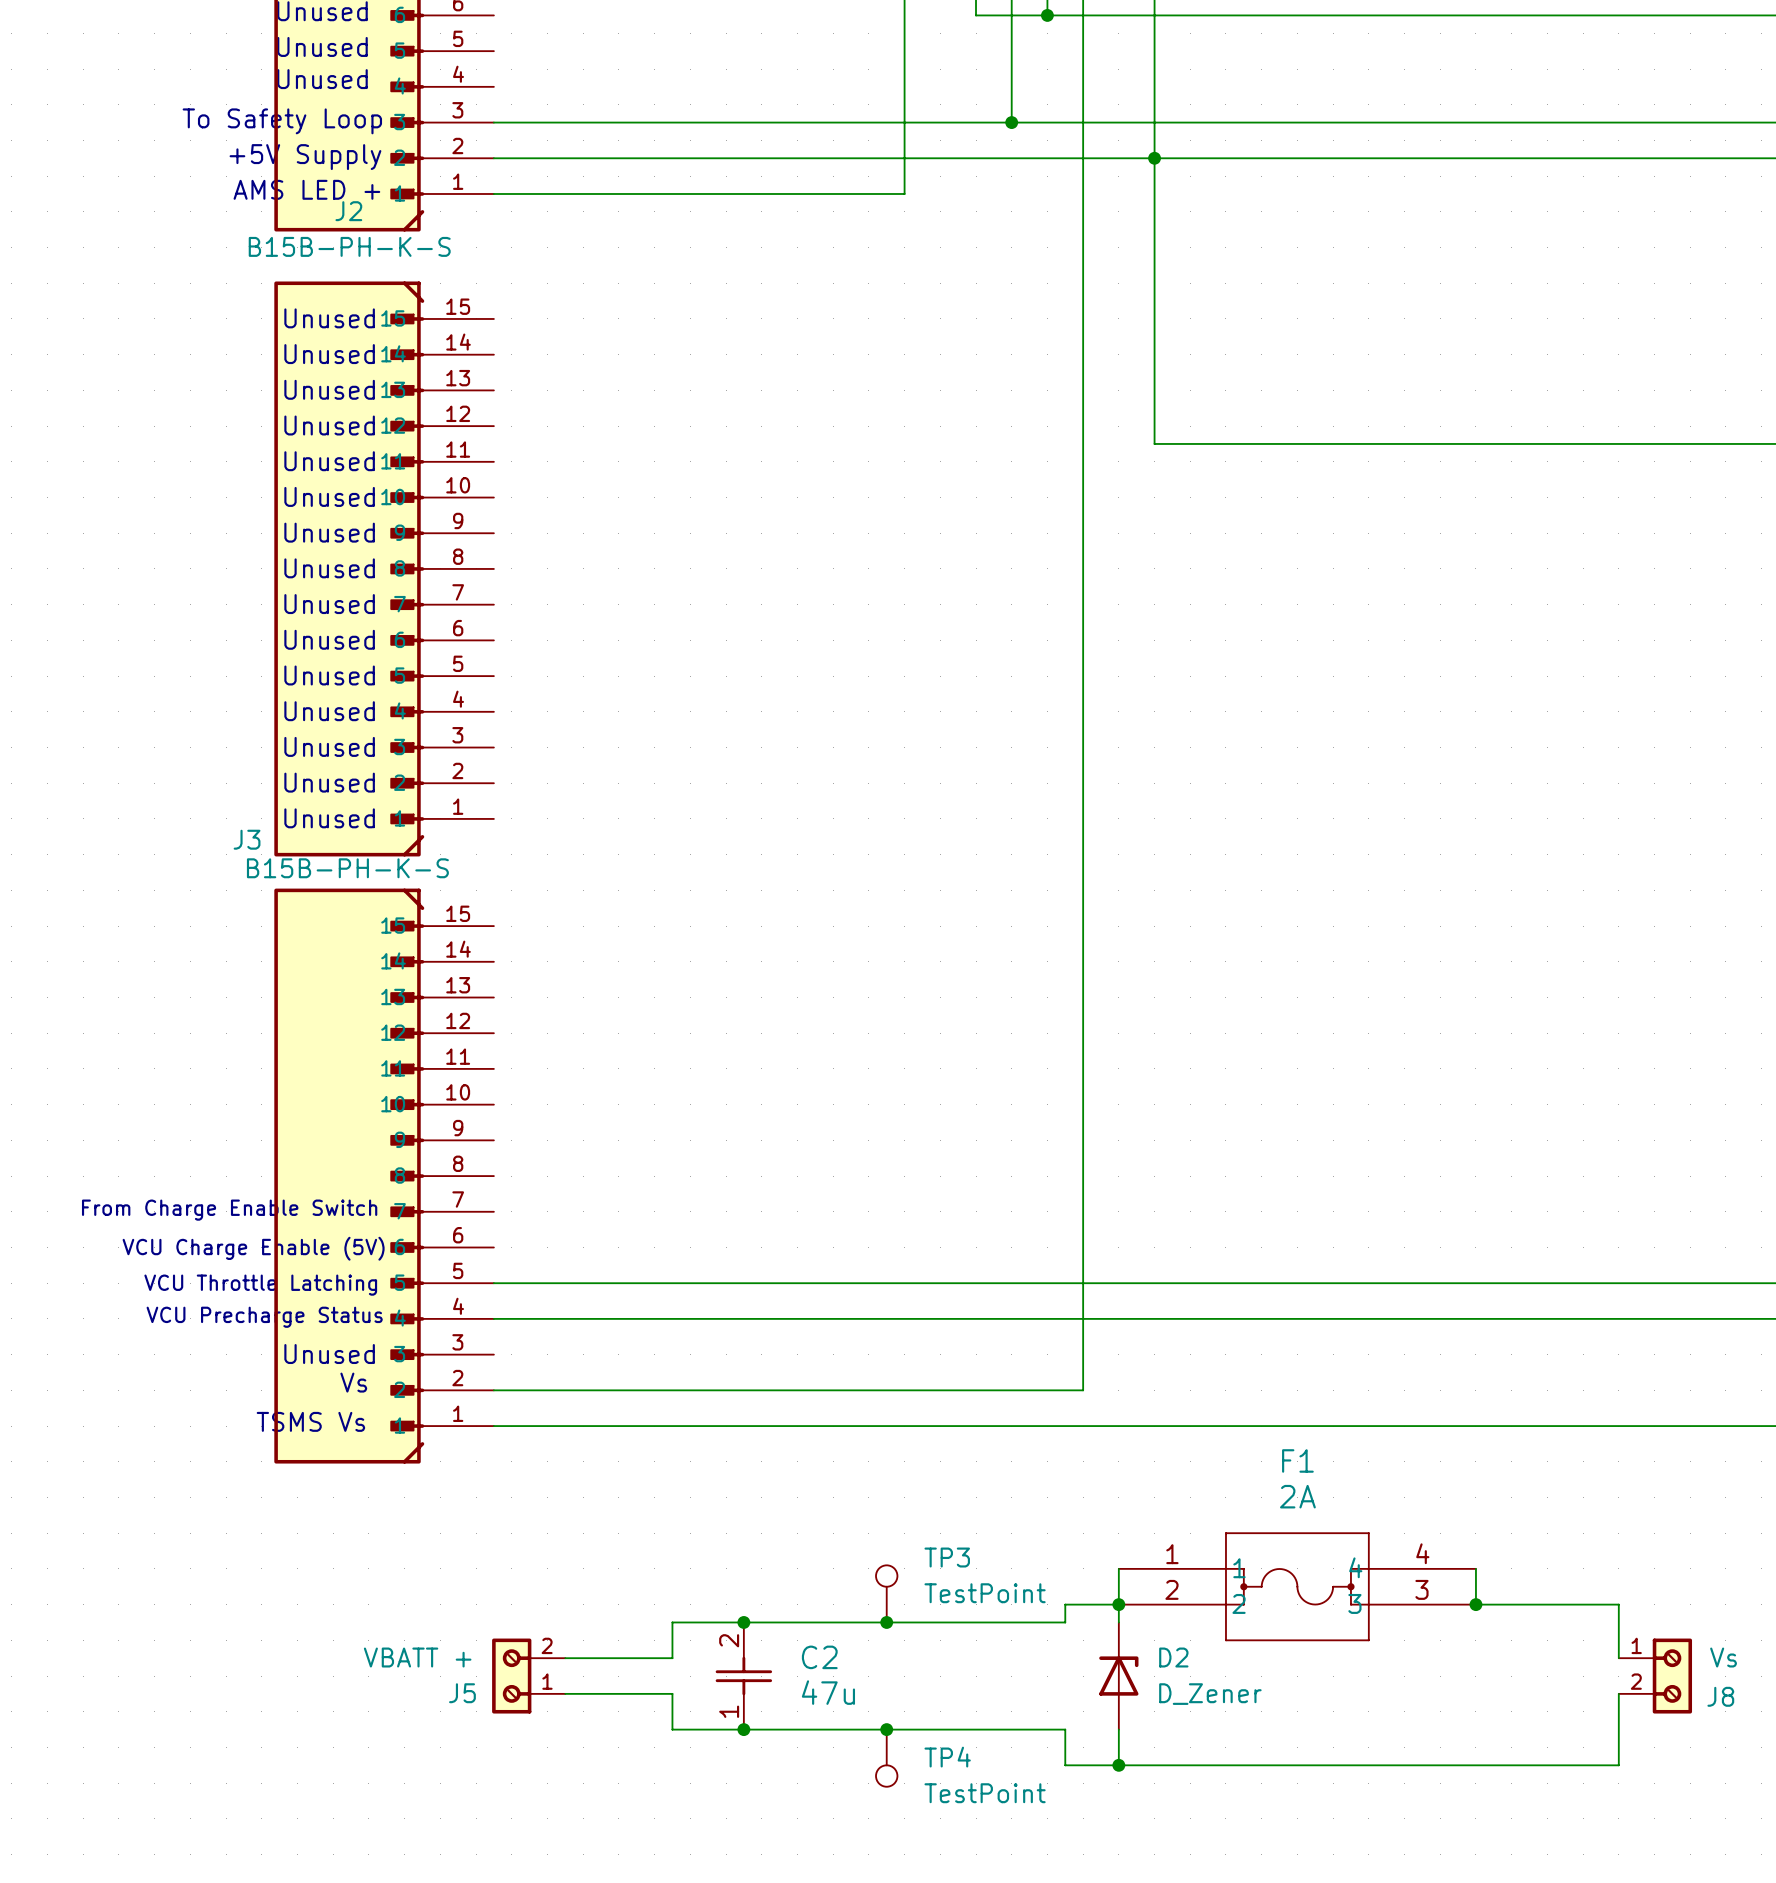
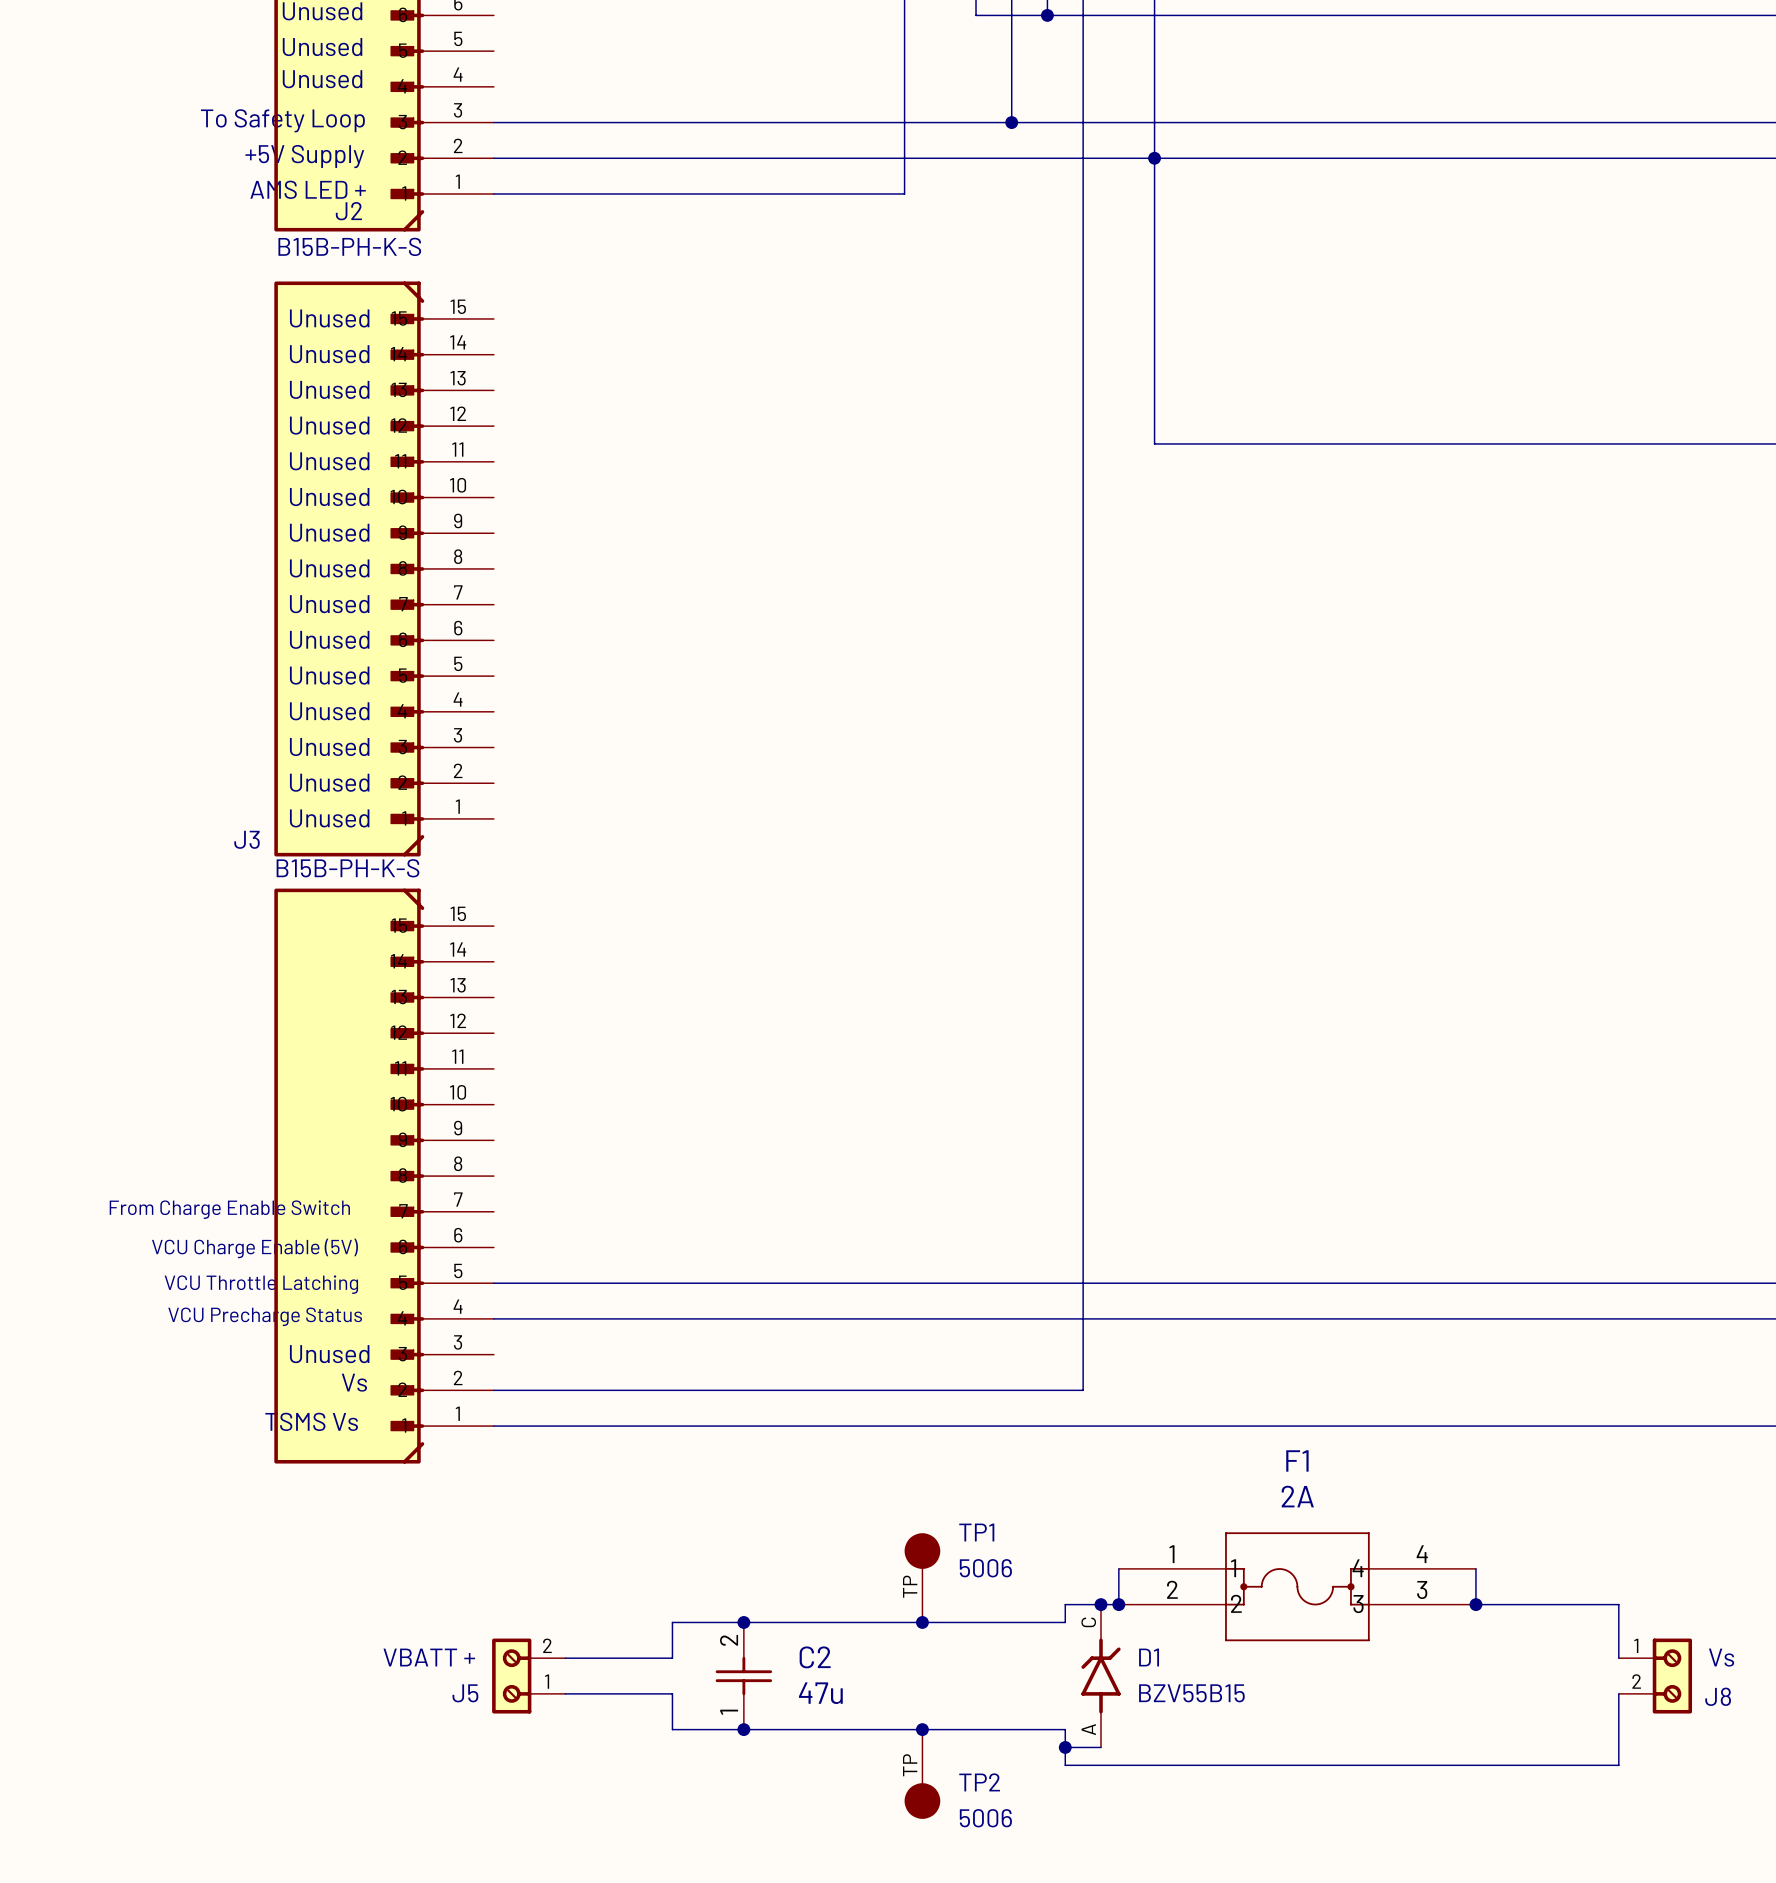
TP1: none -> 5006 (922, 1577)
TP3: TestPoint (886, 1593) -> none
junction: none -> (1100, 1604)
wire: (1118, 1604) (1118, 1622) -> none
junction position: (886, 1622) -> (922, 1622)
D1: none -> BZV55B15 (1100, 1676)
D2: D_Zener (1118, 1676) -> none
junction position: (886, 1729) -> (922, 1729)
wire: (1118, 1729) (1118, 1765) -> none
wire: none -> (1065, 1747) (1100, 1747)
TP4: TestPoint (886, 1758) -> none
junction position: (1118, 1765) -> (1065, 1747)
TP2: none -> 5006 (922, 1774)

